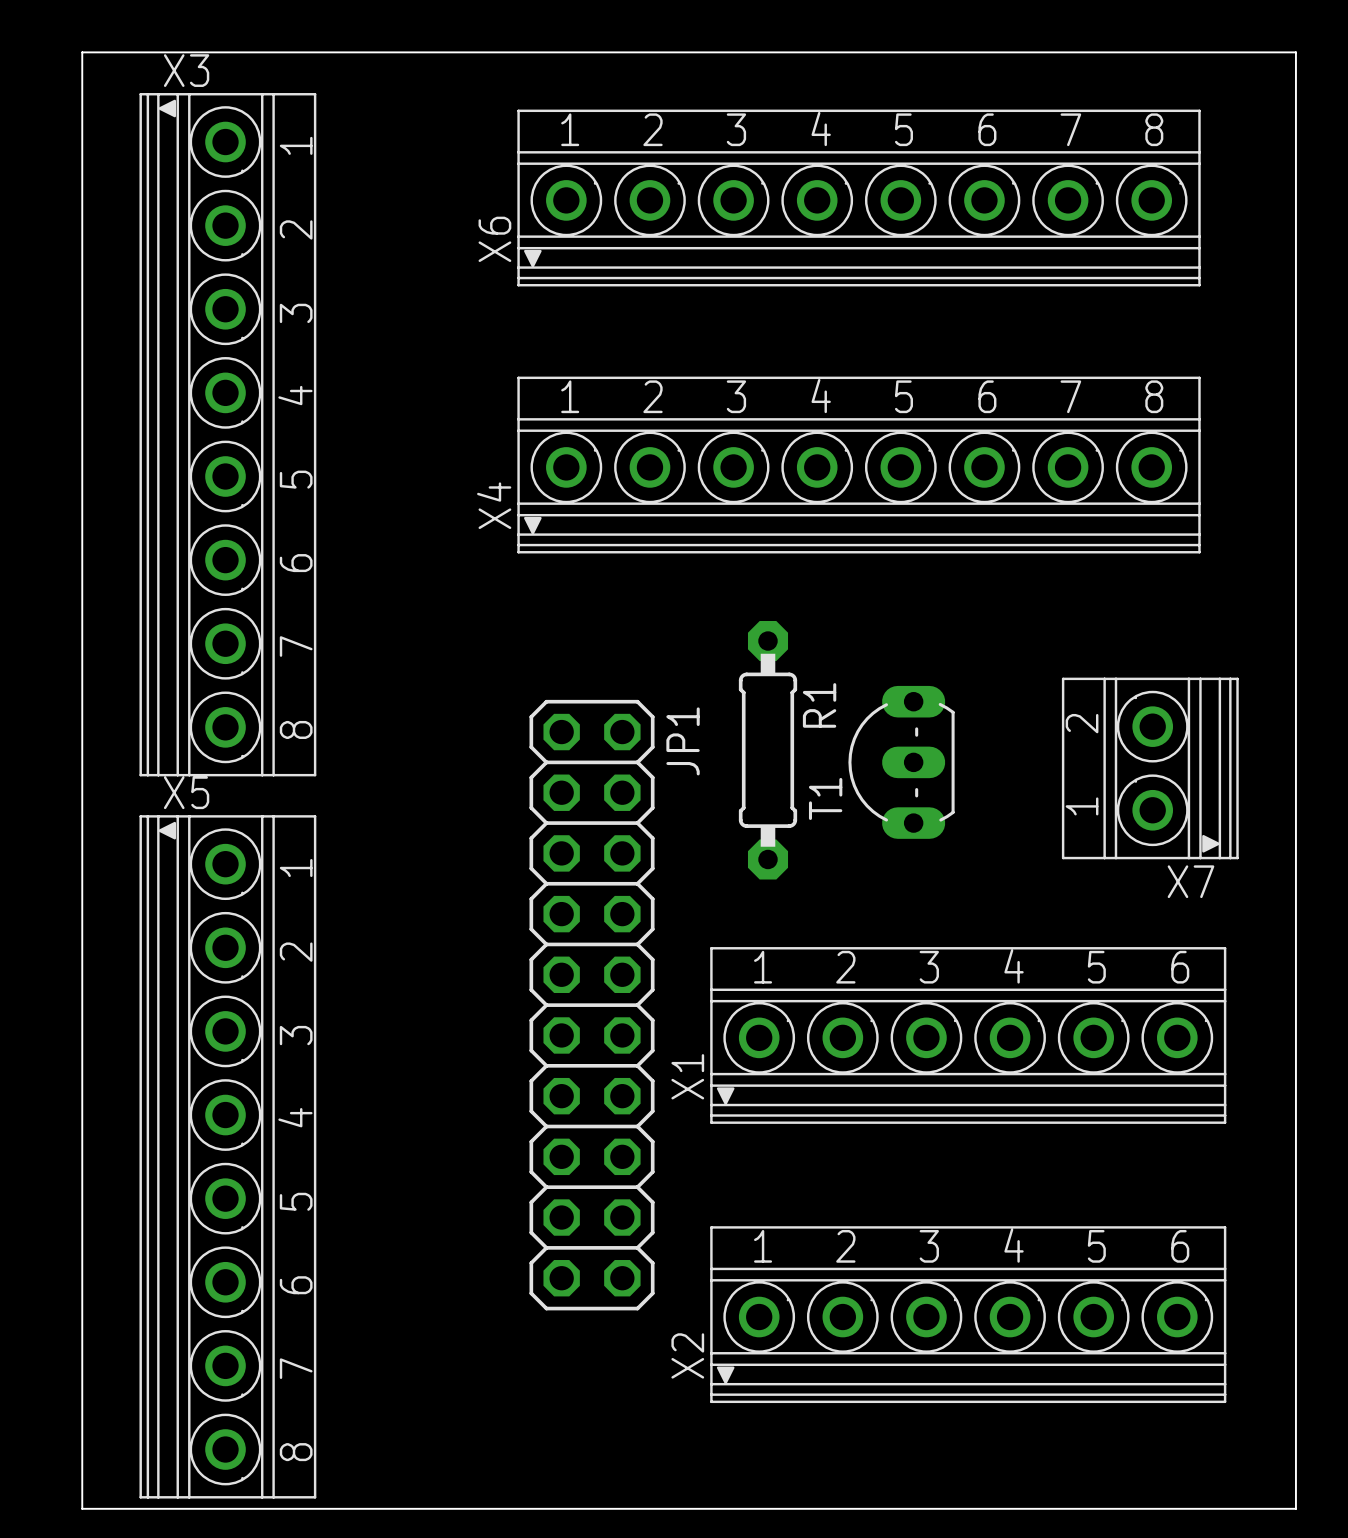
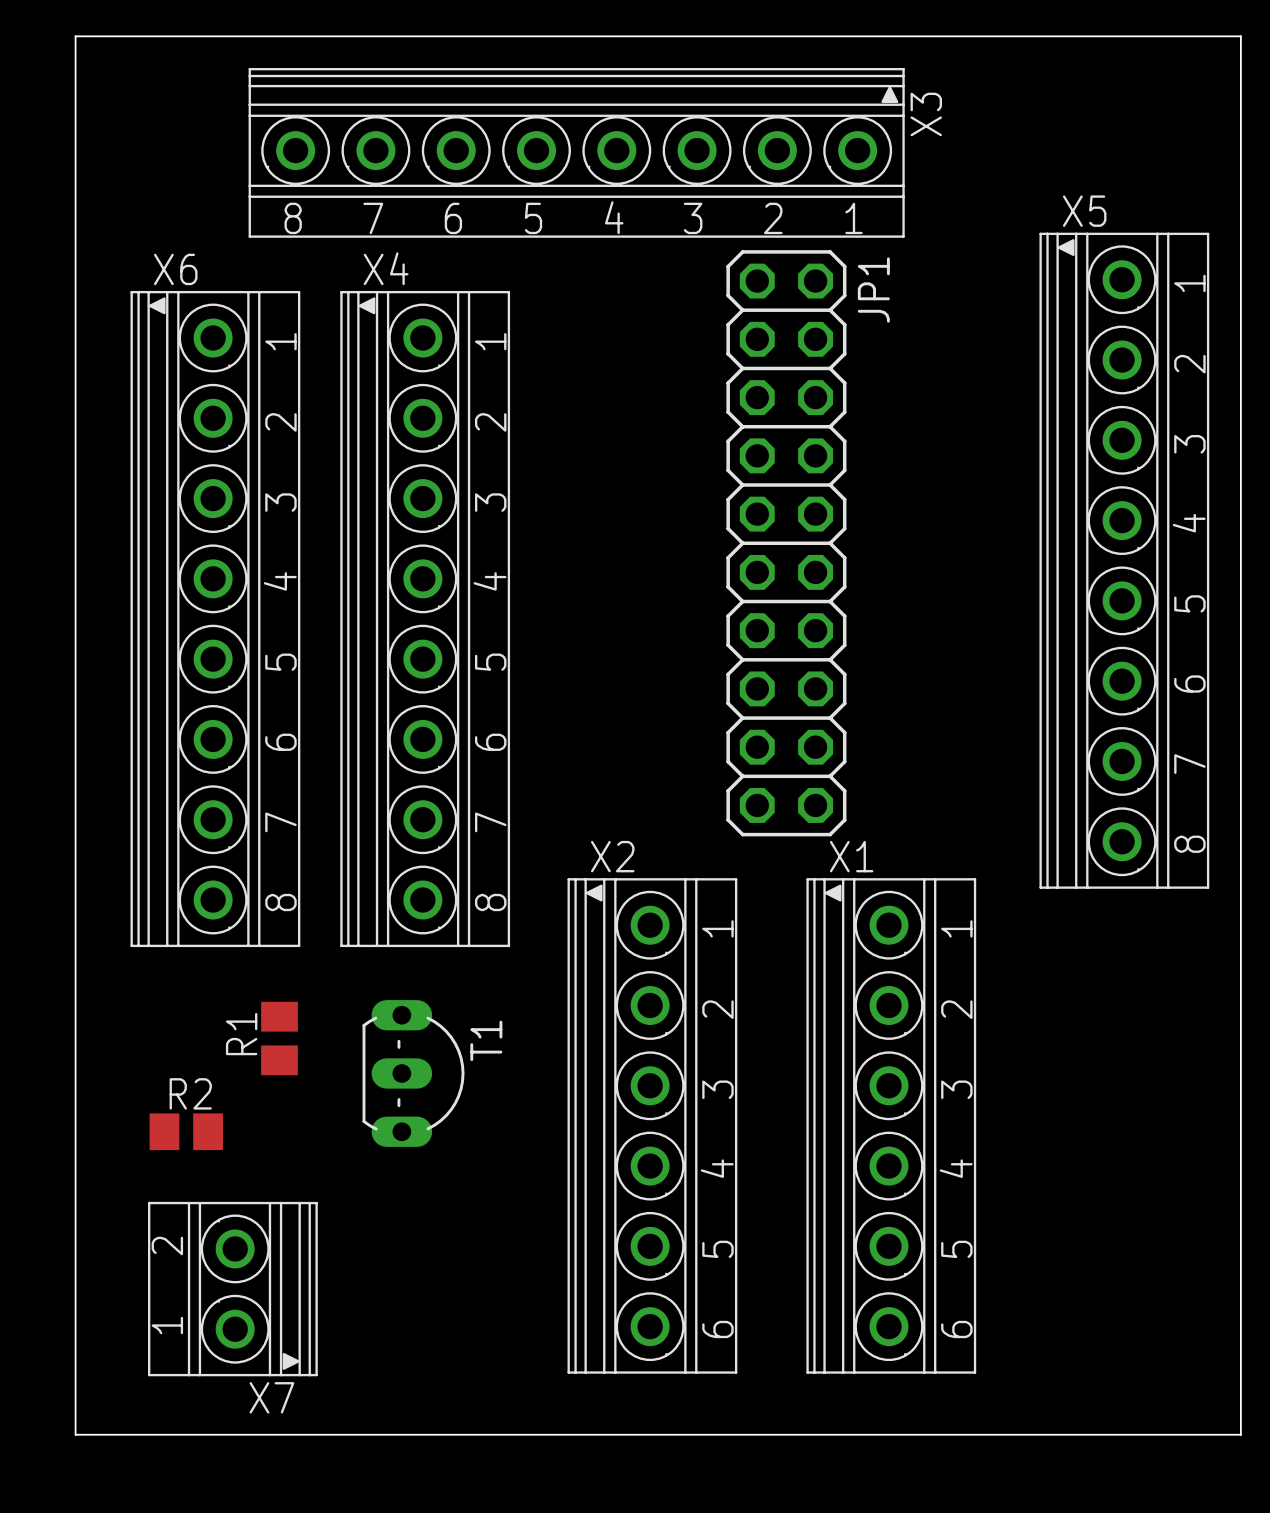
X6 footprint: [517, 109, 1201, 287] -> [130, 290, 301, 948]
X6 name position: X6 (494, 239) -> X6 (175, 269)
X4 footprint: [517, 376, 1201, 554] -> [340, 290, 511, 948]
X3 rotation: 0° (227, 434) -> 90° clockwise (576, 152)
X3 position: (227, 434) -> (576, 152)
X4 name position: X4 (494, 505) -> X4 (386, 268)
R1 footprint: [738, 620, 798, 880] -> [261, 1001, 298, 1076]
R1 name position: R1 (819, 705) -> R1 (241, 1034)
T1 rotation: 0° (901, 762) -> 180° (413, 1073)
T1 position: (901, 762) -> (413, 1073)
X7 position: (1150, 768) -> (232, 1289)
X1 footprint: [710, 947, 1227, 1124] -> [806, 878, 977, 1374]
JP1 position: (592, 1005) -> (786, 543)
X1 name position: X1 (687, 1076) -> X1 (851, 856)
X5 position: (227, 1156) -> (1124, 560)
R2: none -> (186, 1131)
X2 footprint: [710, 1226, 1227, 1404] -> [567, 878, 738, 1374]
X2 name position: X2 (687, 1355) -> X2 (612, 856)

